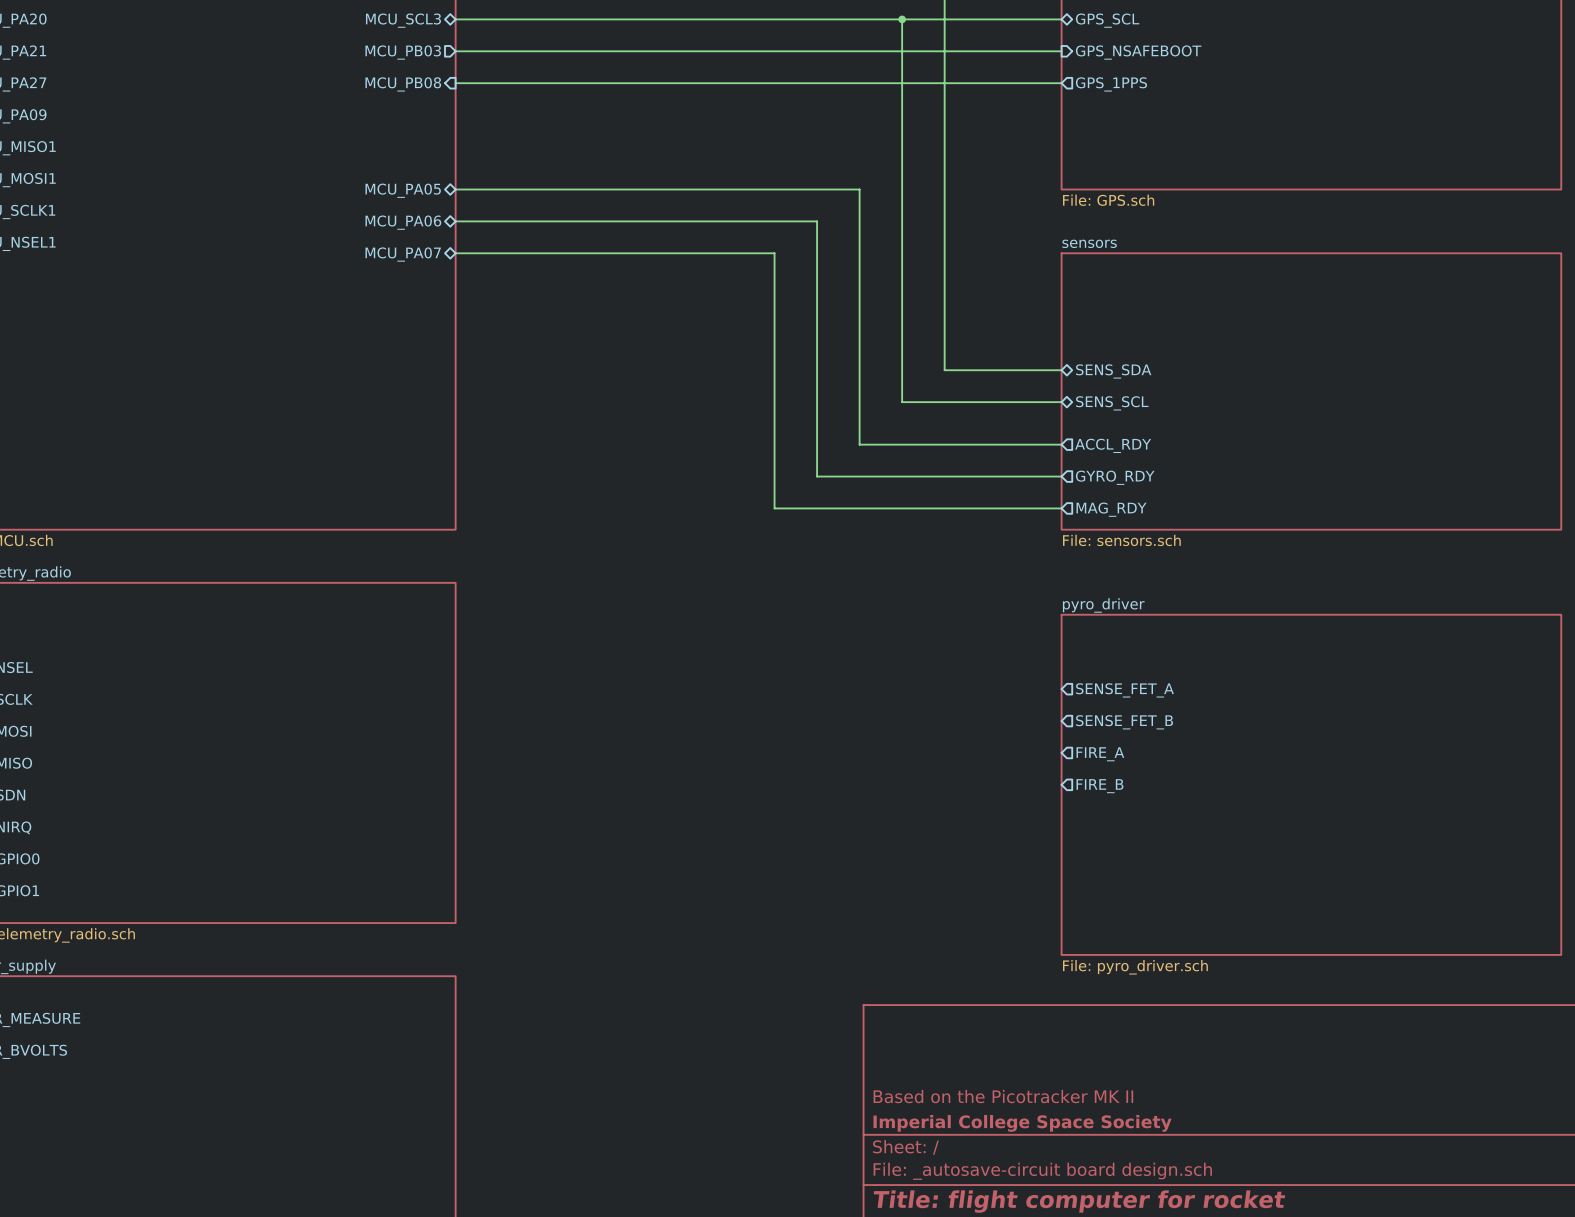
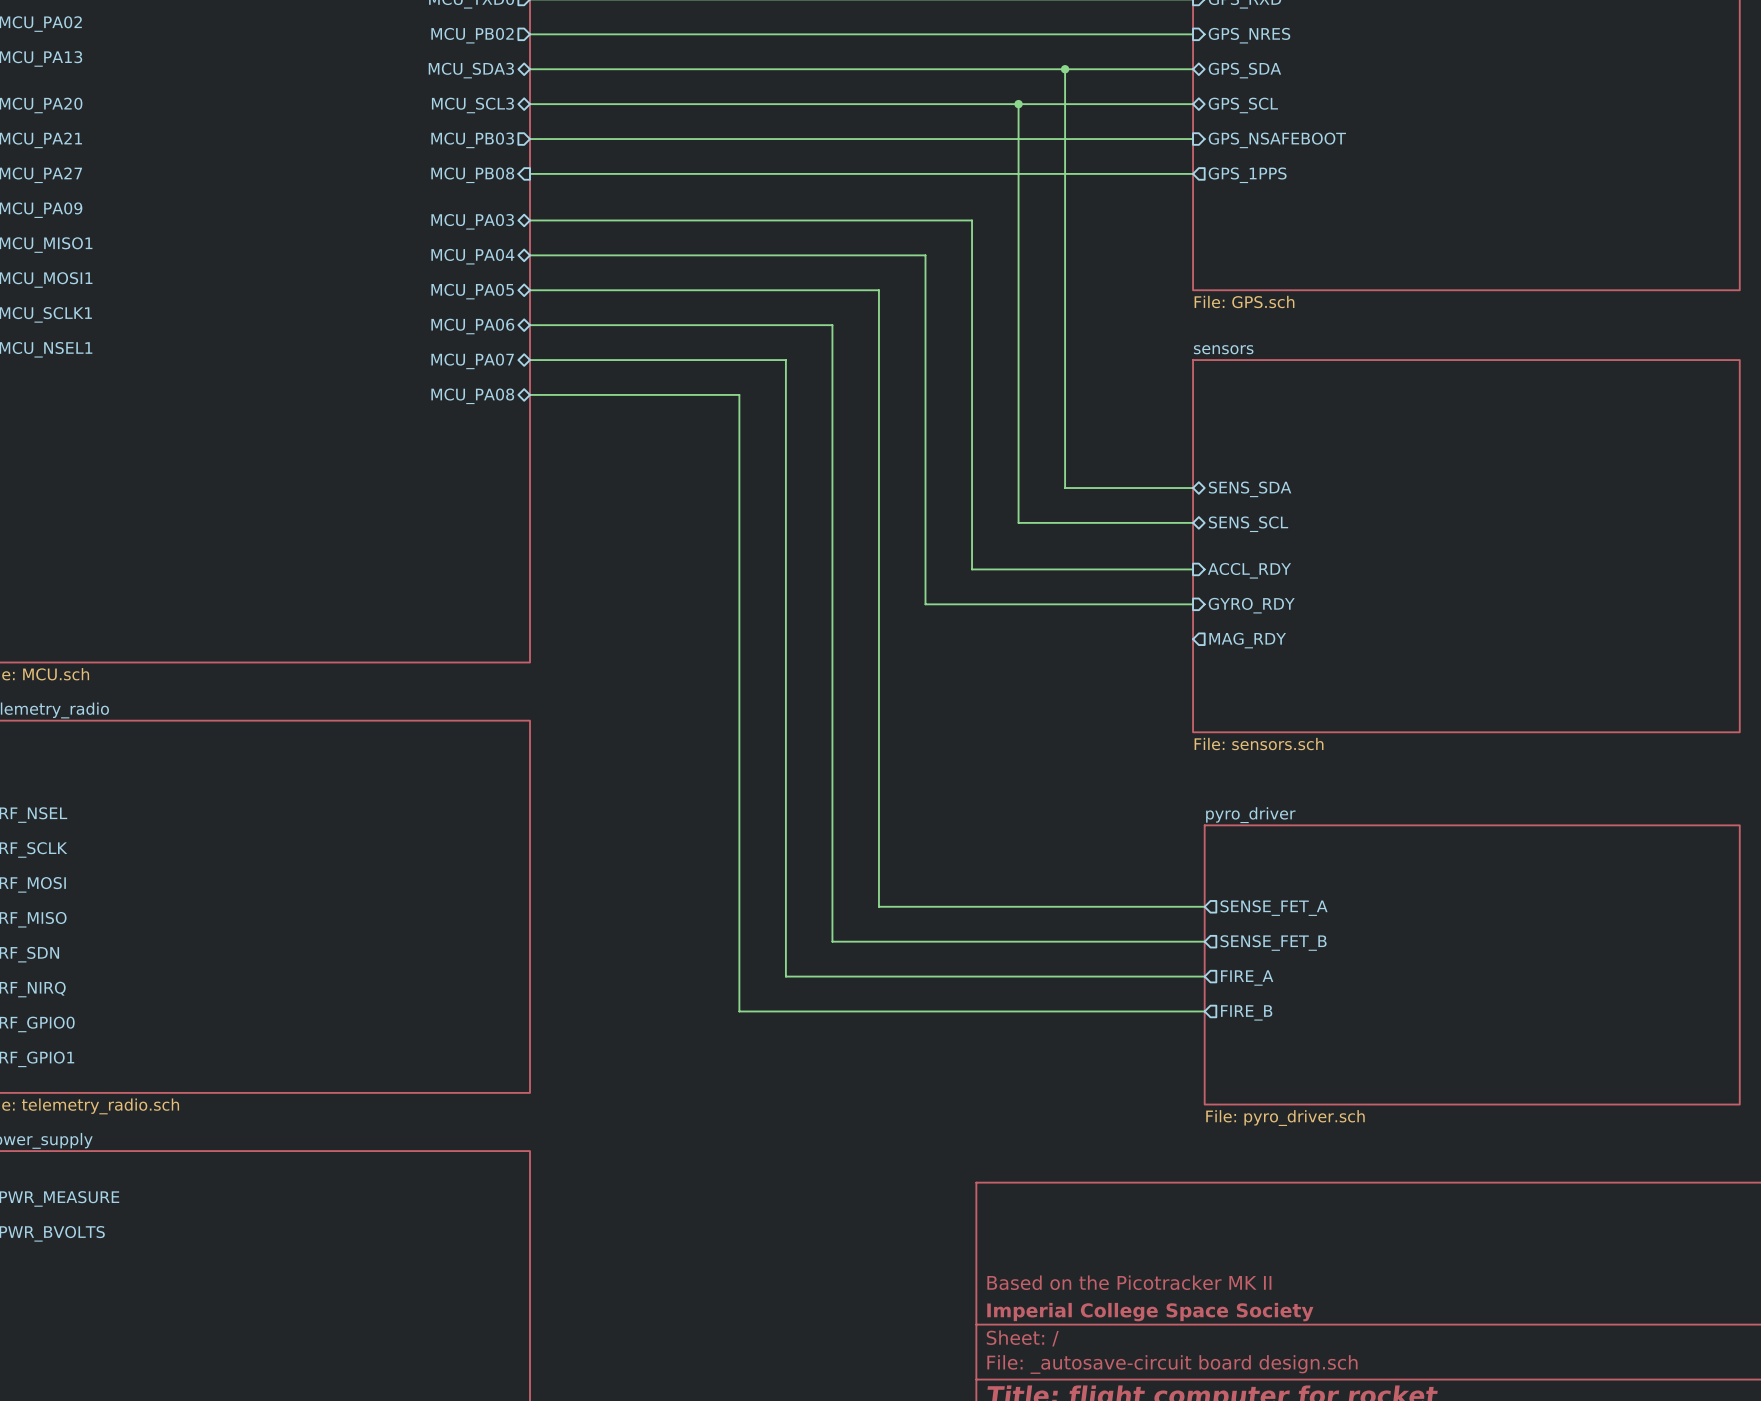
wire: none -> (529, 220) (972, 220) (972, 290)
sheet pin: none -> MCU_PA03 (472, 221)
sheet pin: none -> MCU_PA04 (472, 256)
wire: (774, 189) (859, 189) -> (878, 290) (878, 360)
wire: (732, 221) (817, 221) -> (529, 255) (925, 255) (925, 325)
wire: none -> (832, 325) (832, 941) (1204, 941)
wire: (689, 253) (774, 253) -> (785, 360) (785, 976) (1204, 976)
wire: none -> (529, 394) (739, 394) (739, 1011) (1204, 1011)
sheet pin: none -> MCU_PA08 (472, 396)
sheet sensors: File: sensors.sch (1311, 391) -> none
sheet sensors: none -> File: sensors.sch (1466, 546)
sheet pin shape: output (1113, 445) -> input (1249, 570)
sheet pin shape: output (1115, 477) -> input (1251, 605)
wire: (774, 508) (1061, 508) -> (878, 639) (878, 906) (1204, 906)
sheet pin position: SENSE_FET_A (1124, 690) -> SENSE_FET_A (1274, 908)
sheet pin position: SENSE_FET_B (1124, 722) -> SENSE_FET_B (1273, 943)
sheet pin position: FIRE_A (1100, 754) -> FIRE_A (1247, 978)
sheet pyro_driver: File: pyro_driver.sch (1311, 784) -> none
sheet pin position: FIRE_B (1099, 786) -> FIRE_B (1246, 1012)
sheet pyro_driver: none -> File: pyro_driver.sch (1472, 964)

